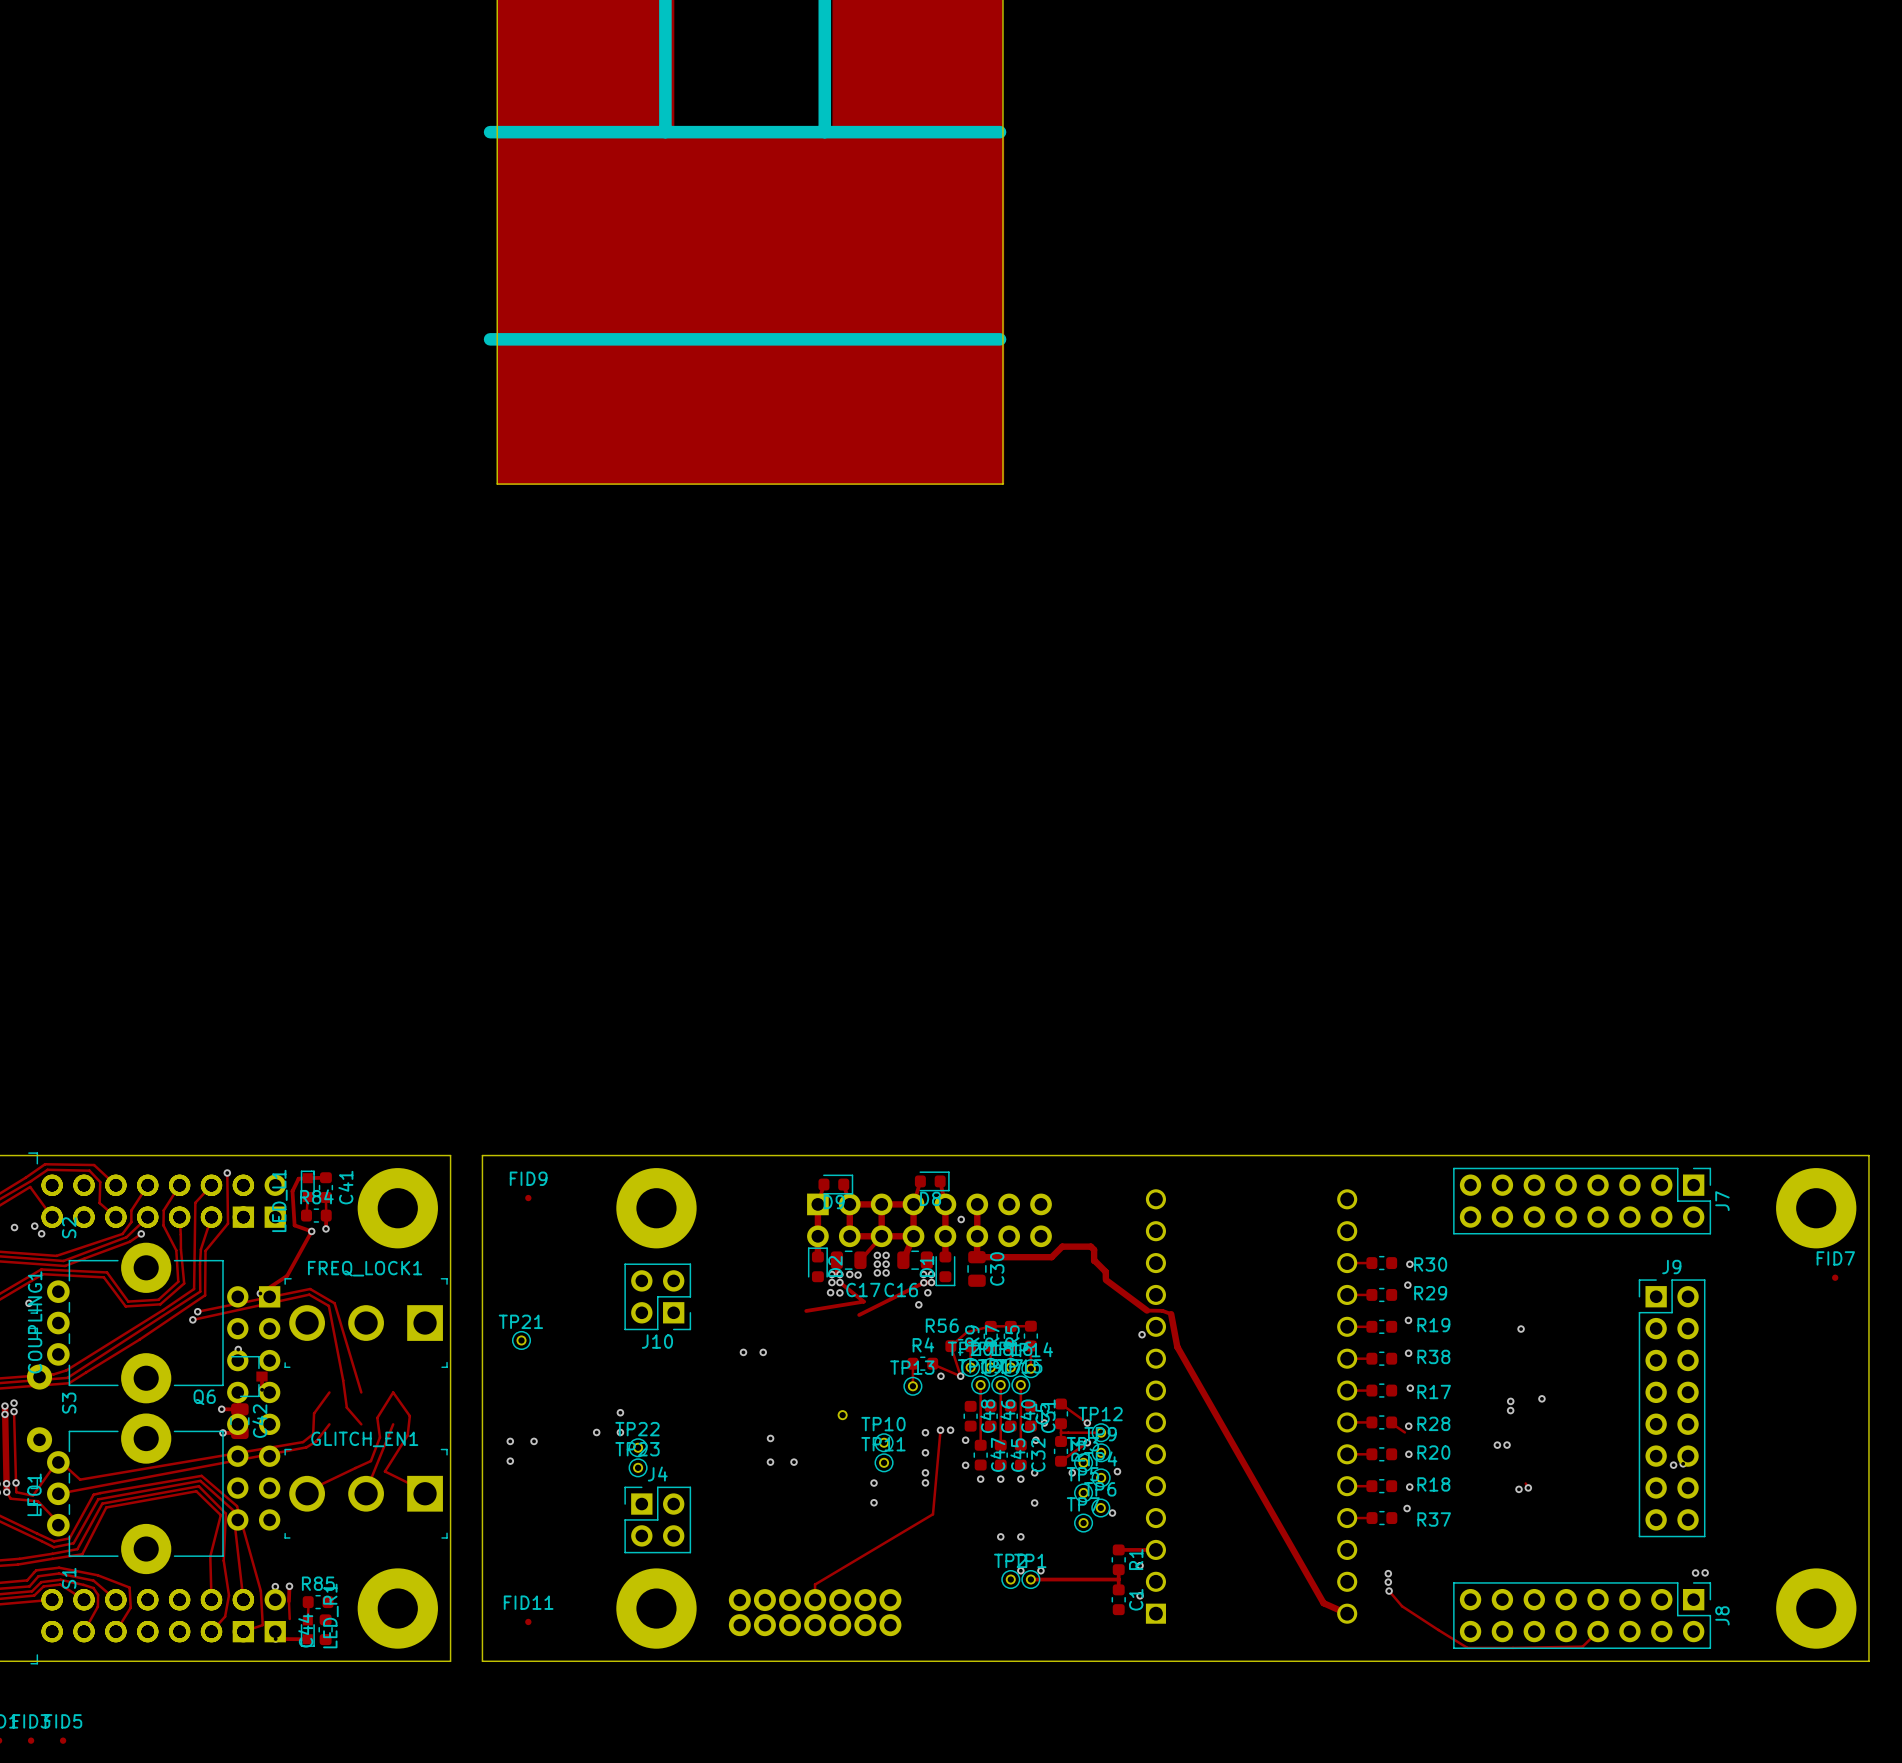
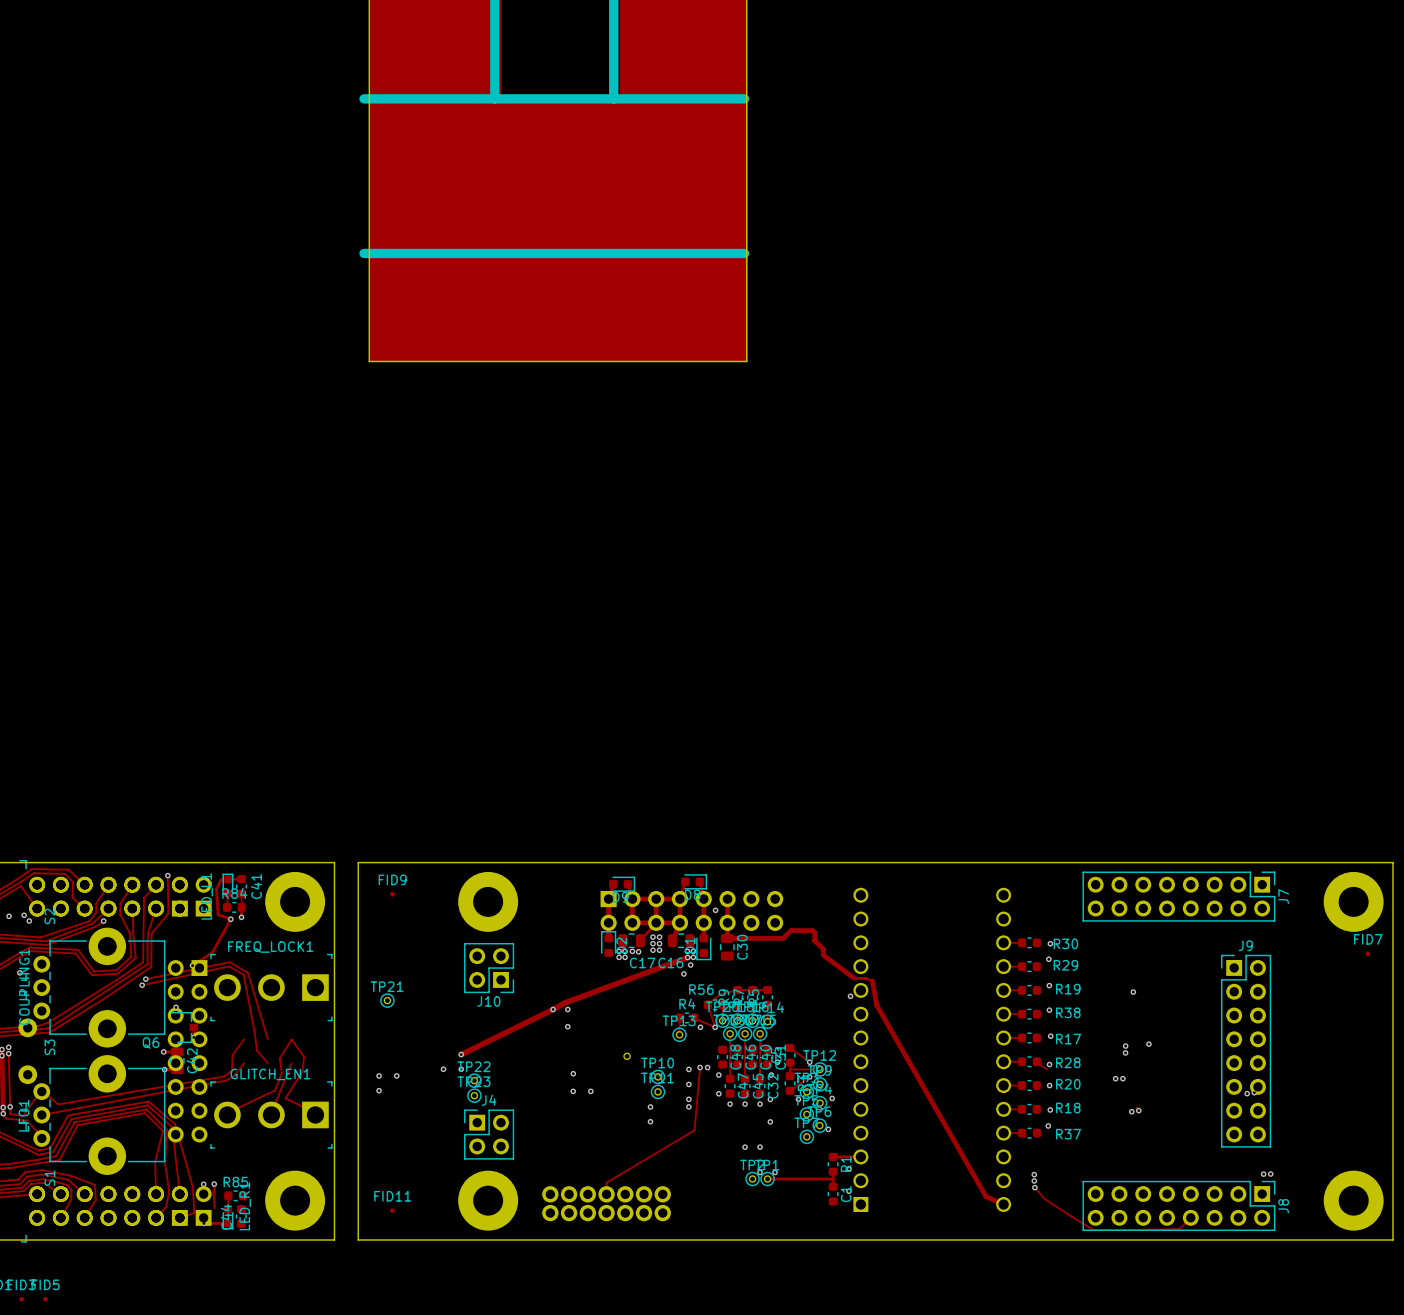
track: (839, 1282) (863, 1301) (806, 1310) -> none
track: (923, 1282) (859, 1314) -> (687, 957) (564, 1002) (461, 1054)
via: (830, 1292) -> none
via: (839, 1292) -> none
via: none -> (567, 1026)

